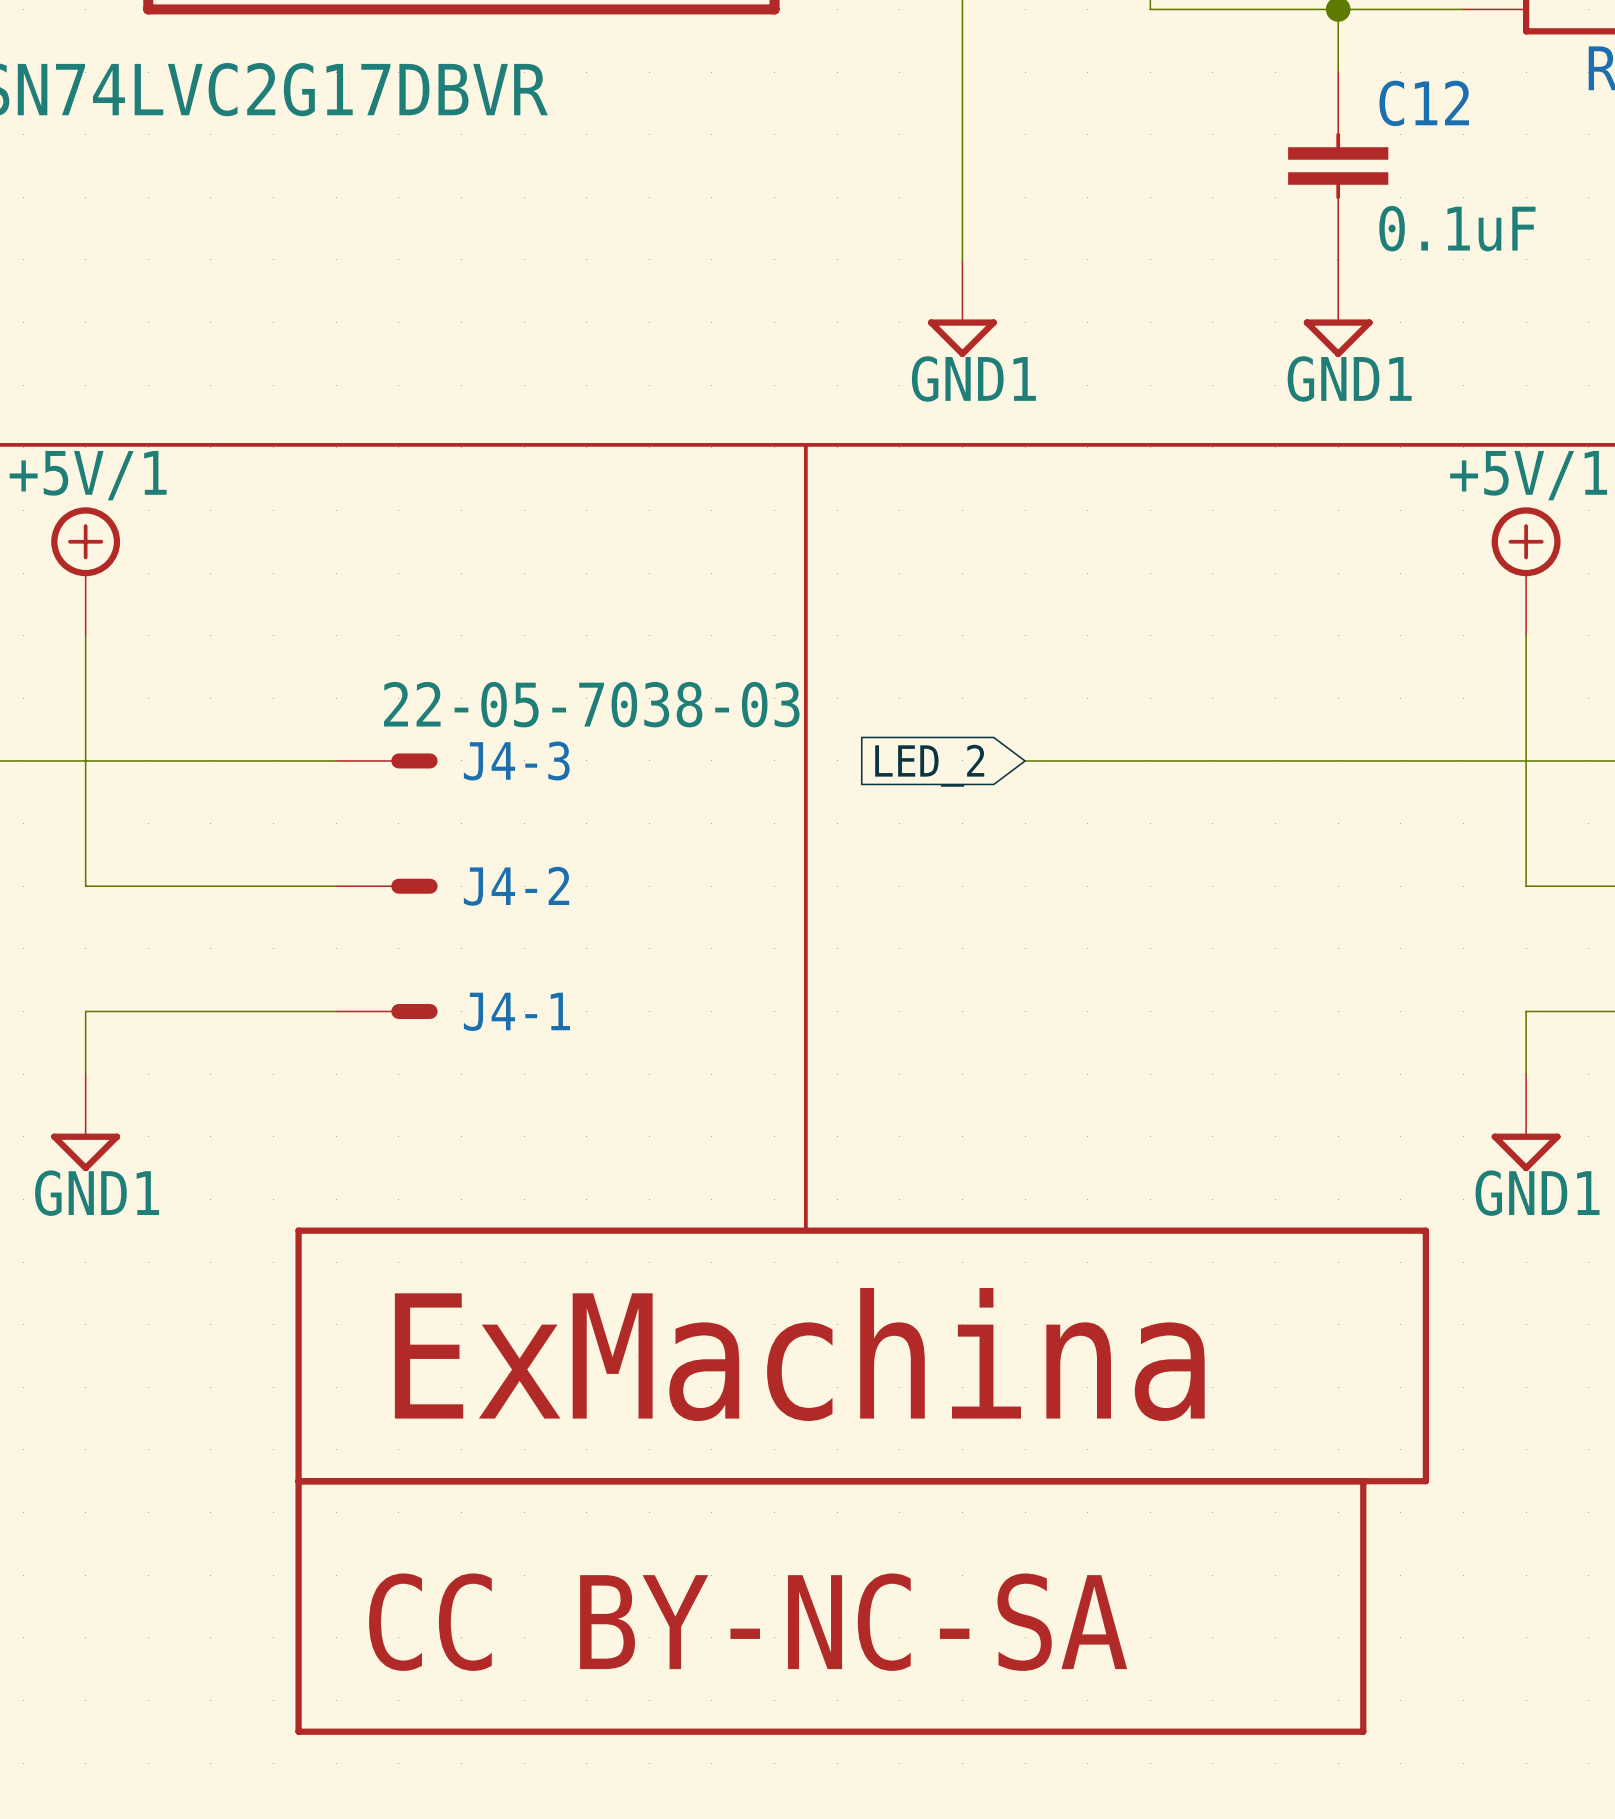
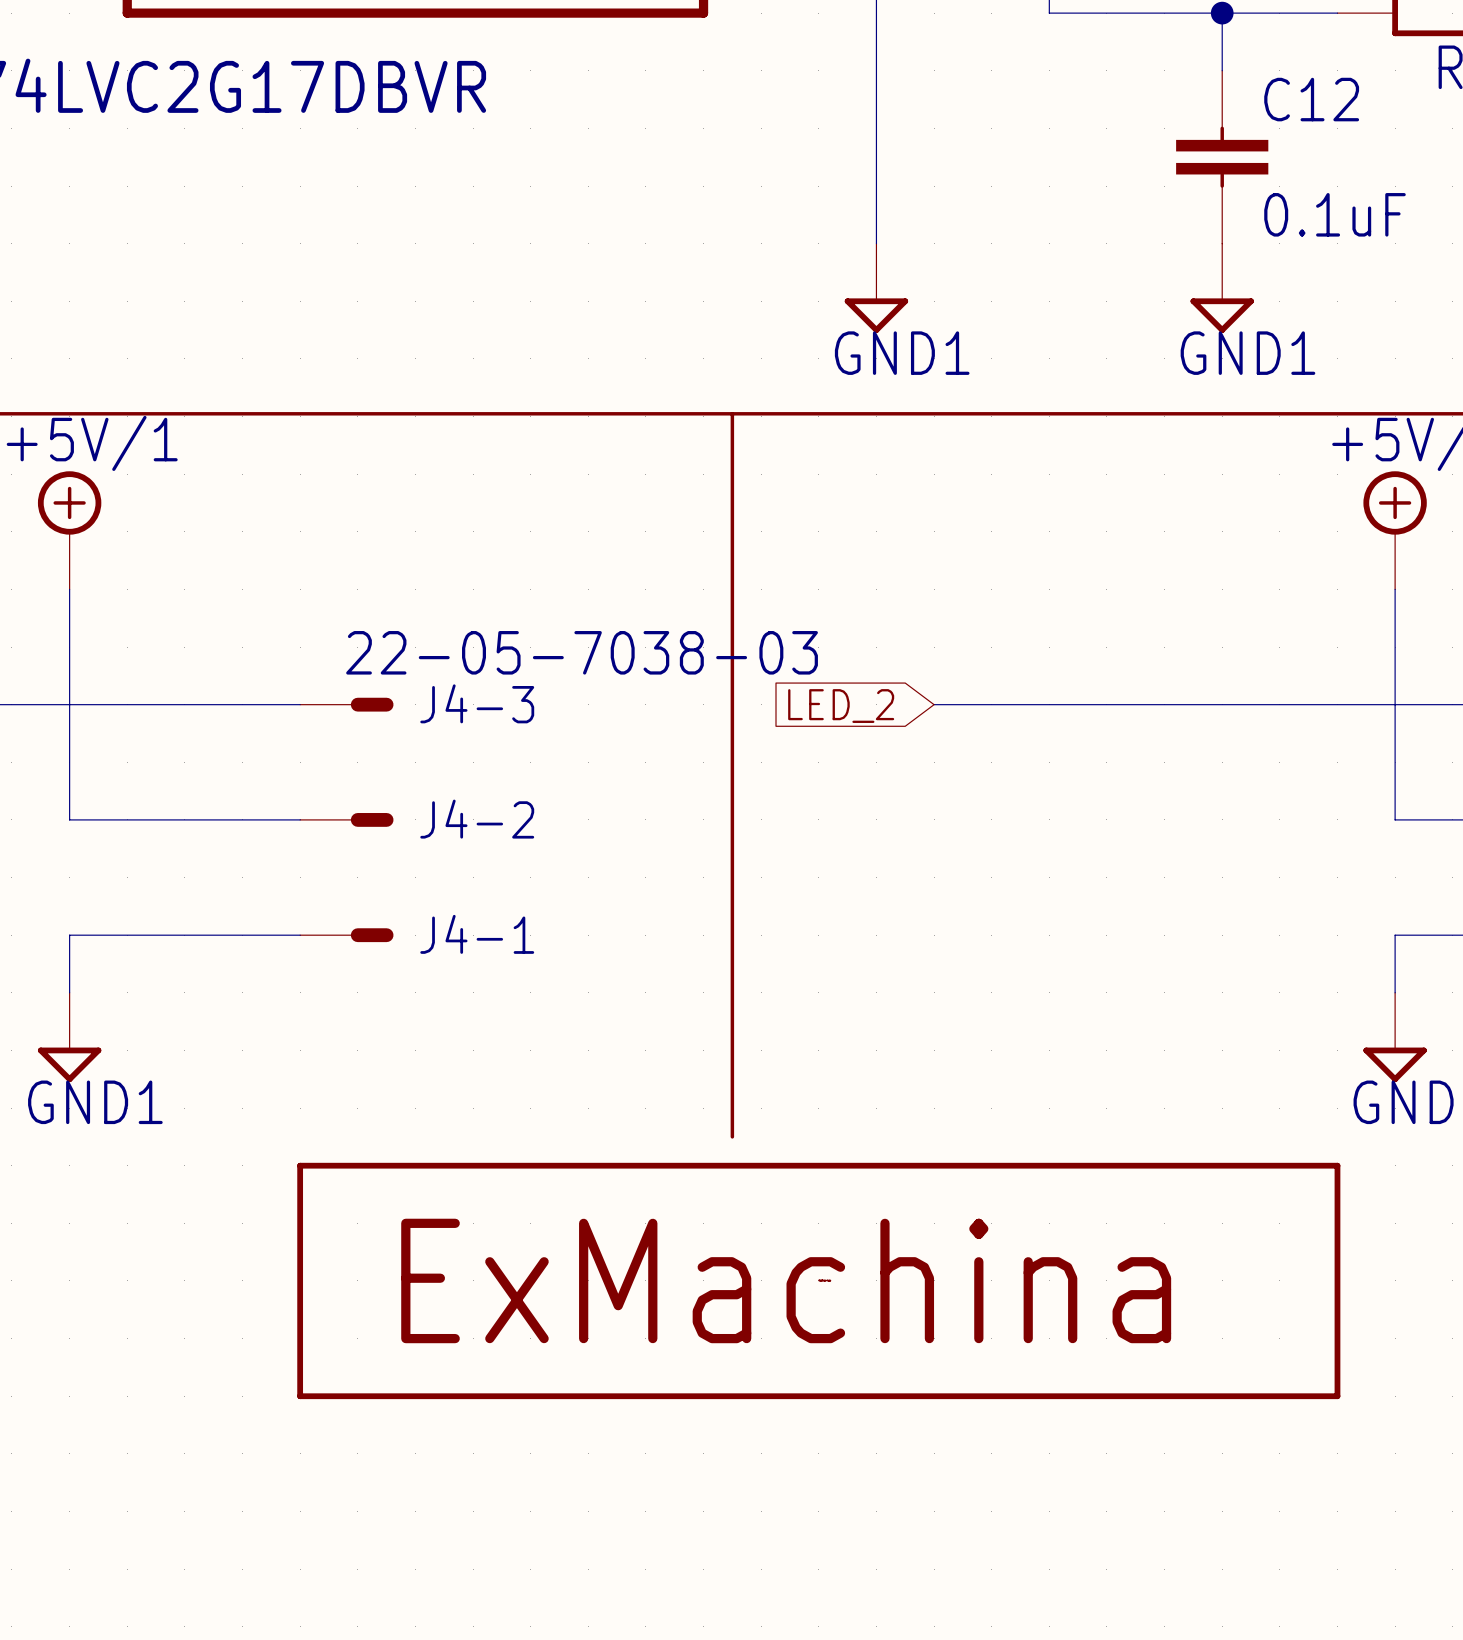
part position: (862, 1355) -> (818, 1280)
part: (830, 1606) -> none

